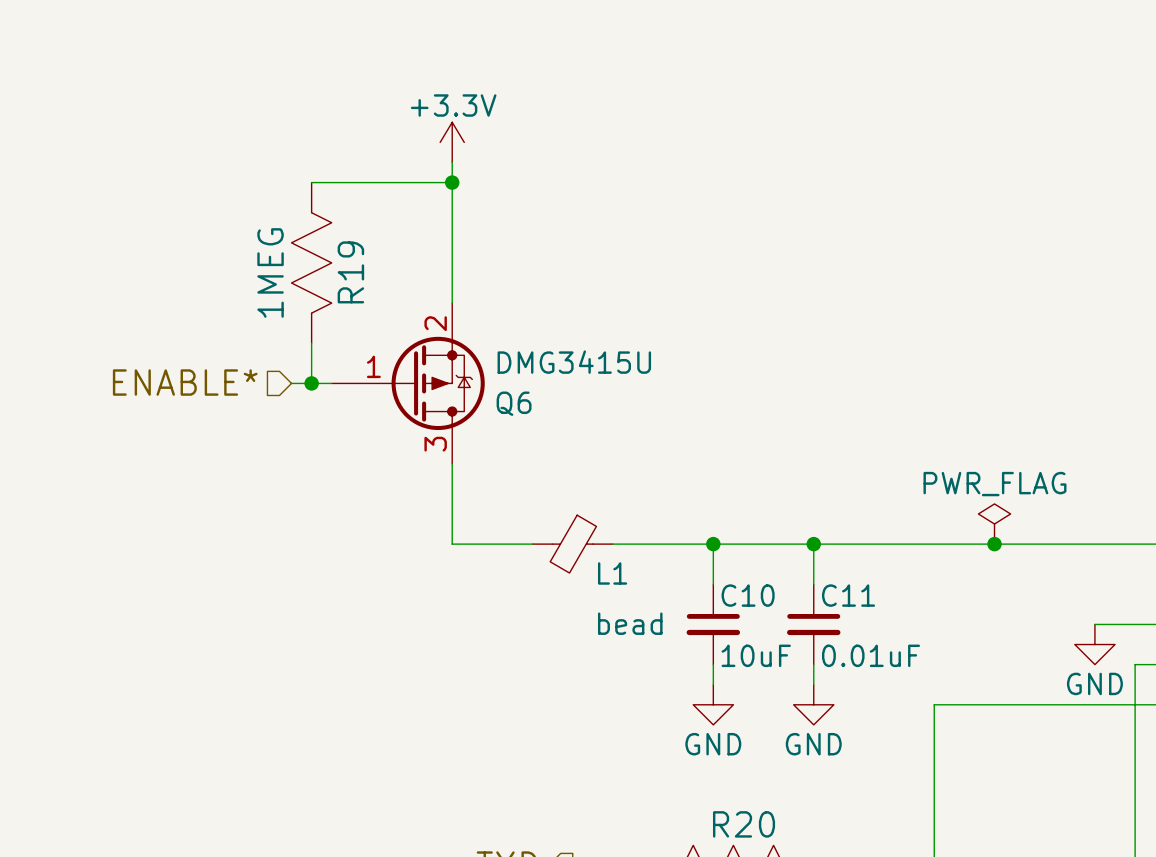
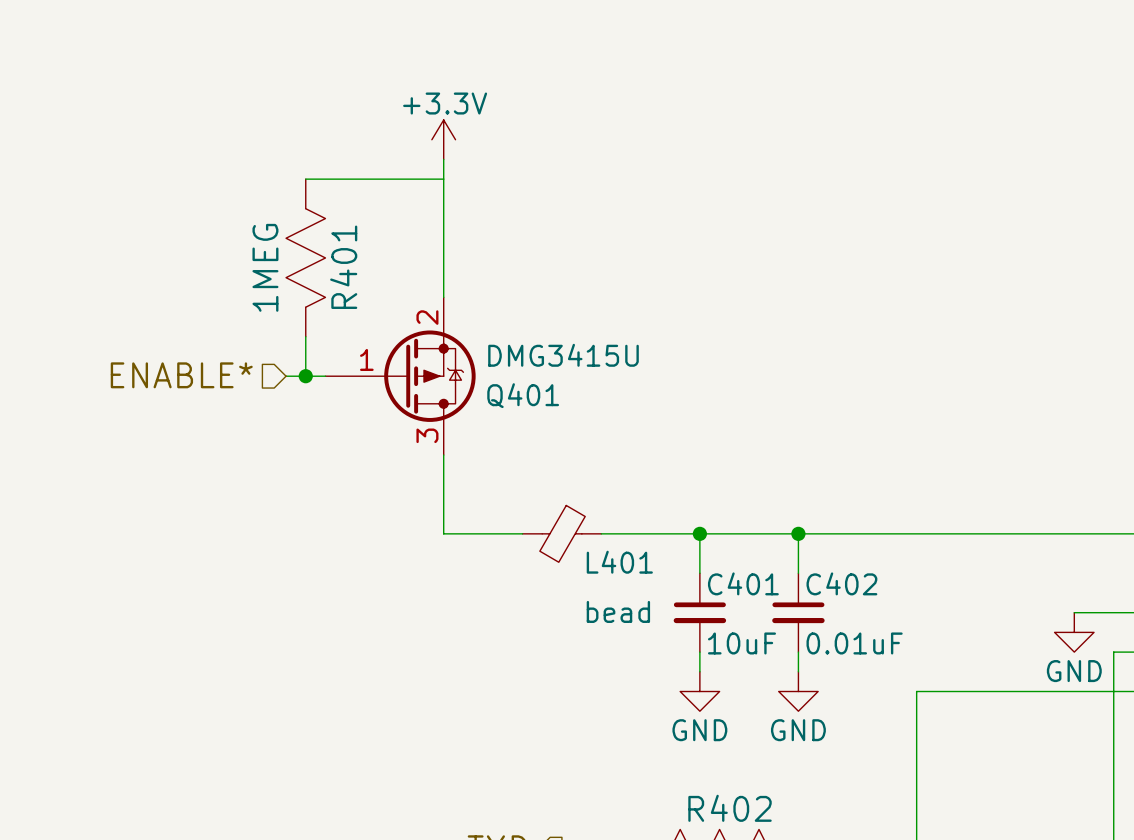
junction: (452, 182) -> none
R19 name: R19 (350, 272) -> R401 (343, 267)
Q6 name: Q6 (514, 403) -> Q401 (523, 395)
power symbol: PWR_FLAG (994, 524) -> none
junction: (994, 544) -> none
L1 name: L1 (612, 573) -> L401 (619, 562)
C10 name: C10 (748, 595) -> C401 (743, 583)
C11 name: C11 (848, 595) -> C402 (841, 583)
R20 name: R20 (744, 824) -> R402 (730, 808)

